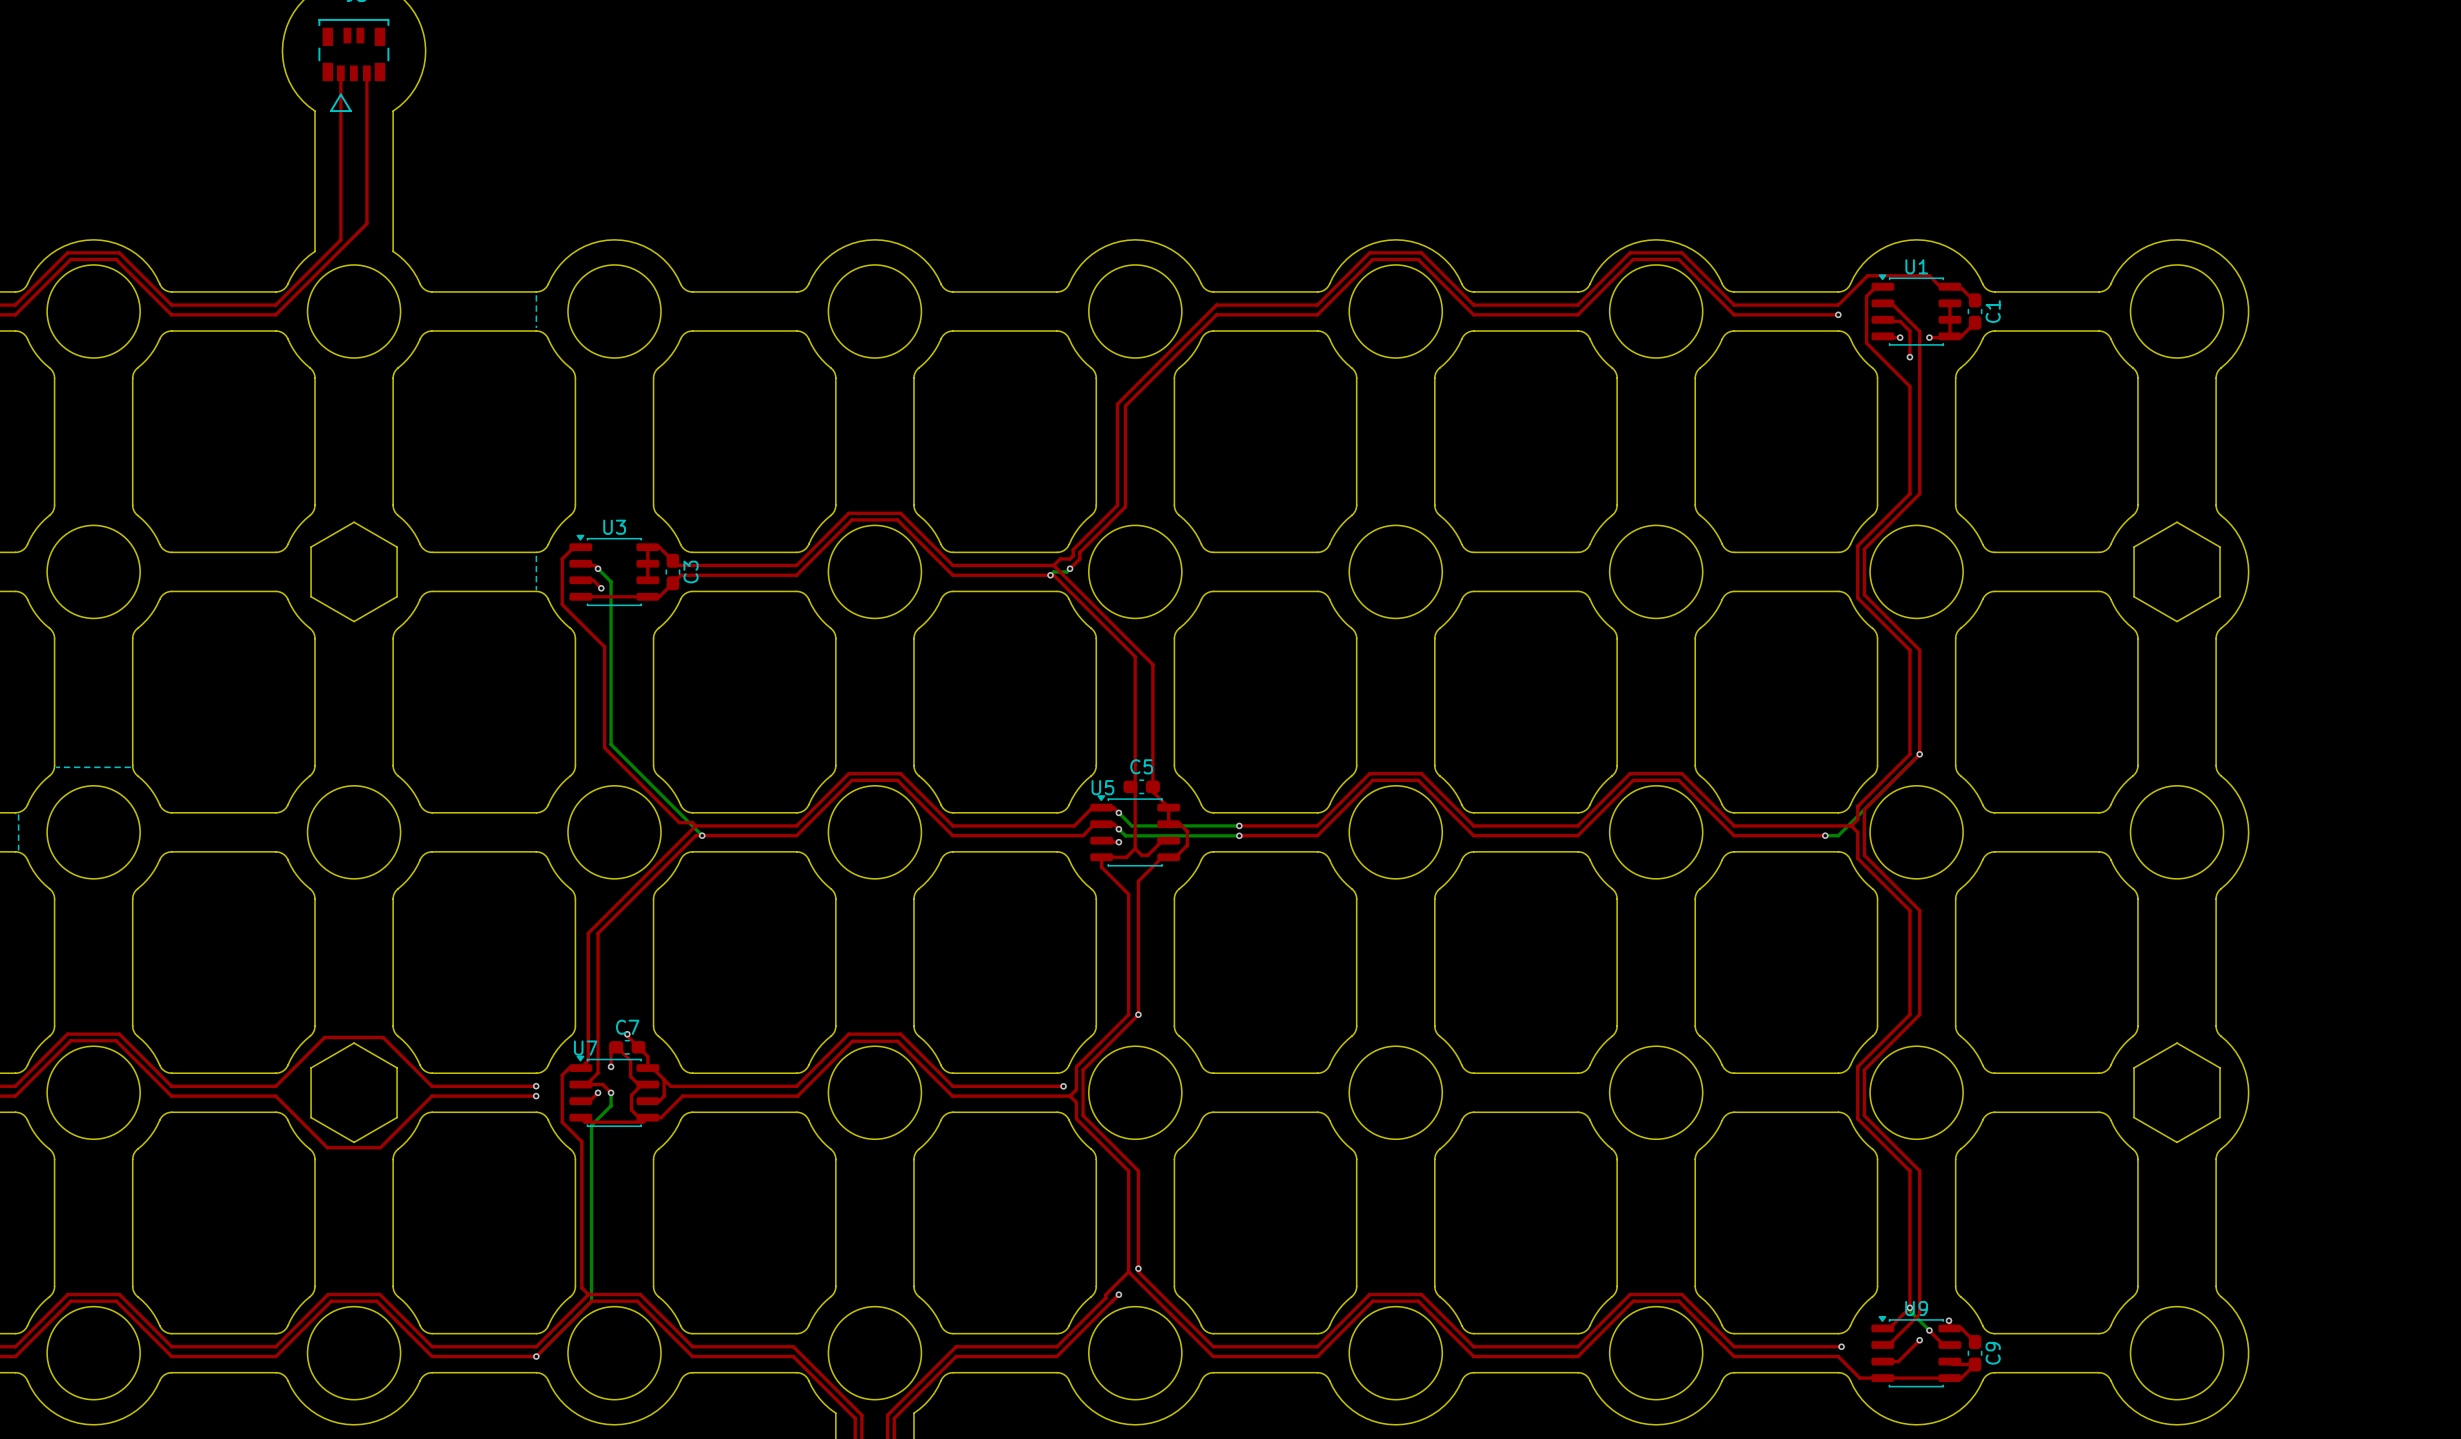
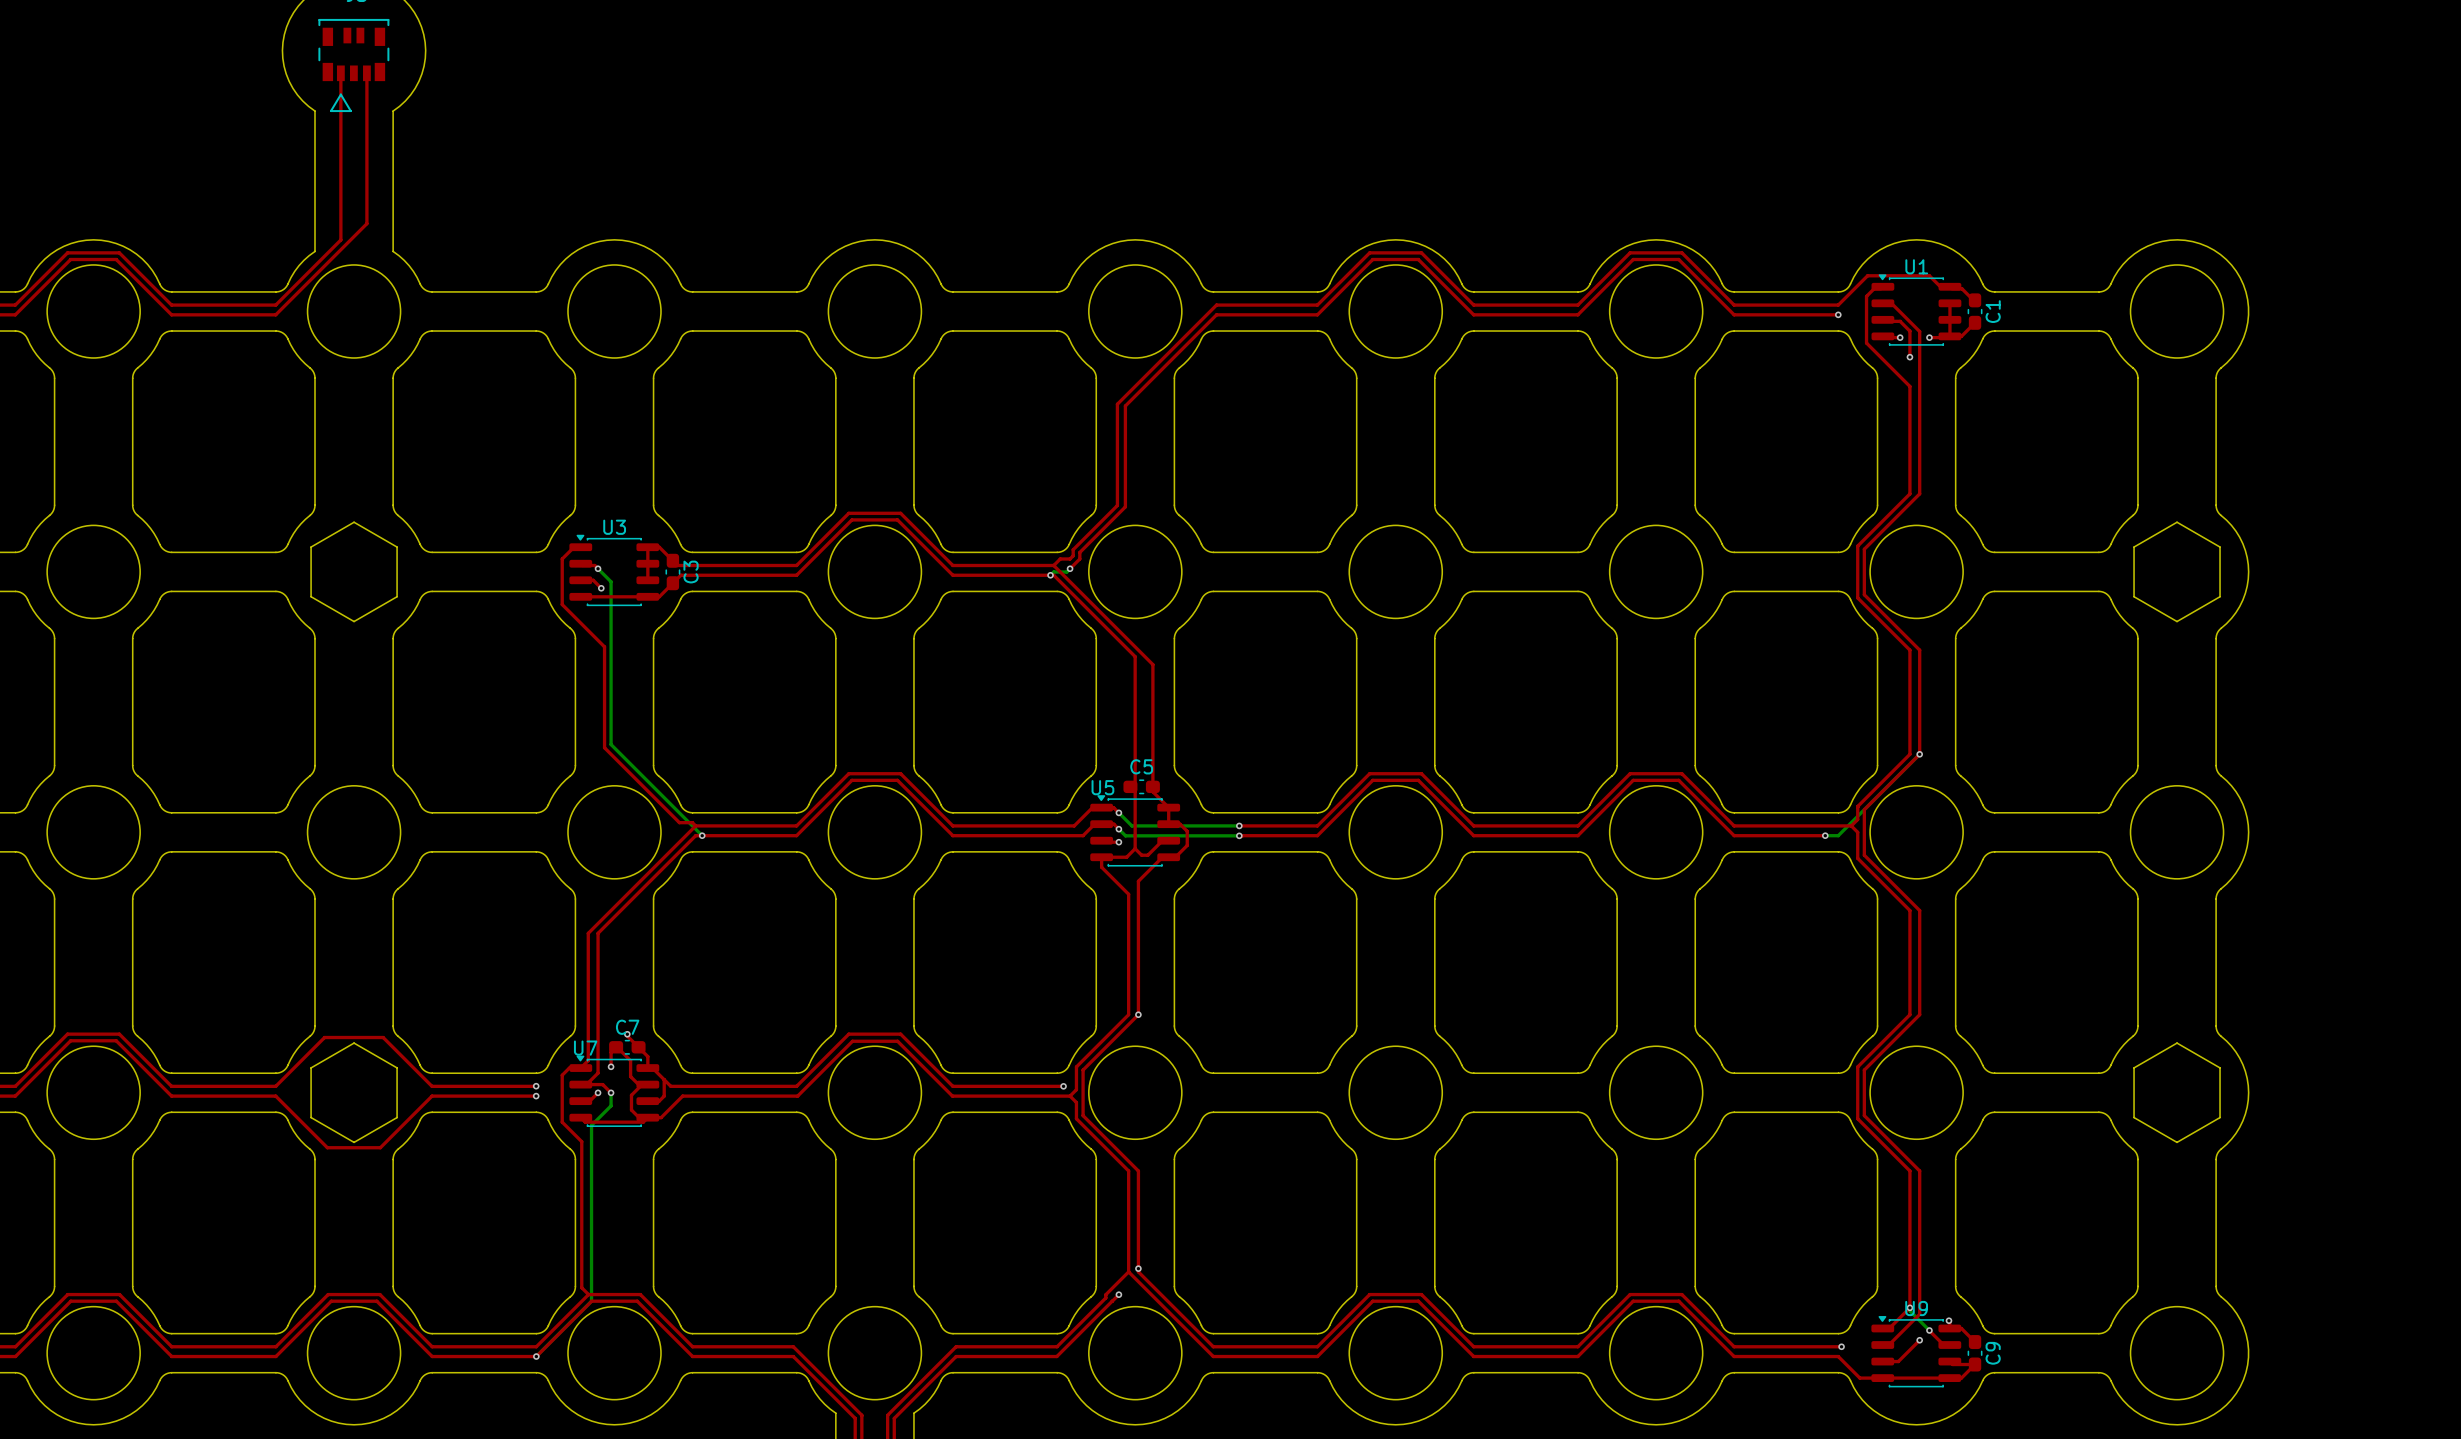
line: (536, 295) (536, 327) -> none
line: (536, 555) (536, 589) -> none
line: (56, 767) (130, 767) -> none
line: (18, 814) (18, 850) -> none

